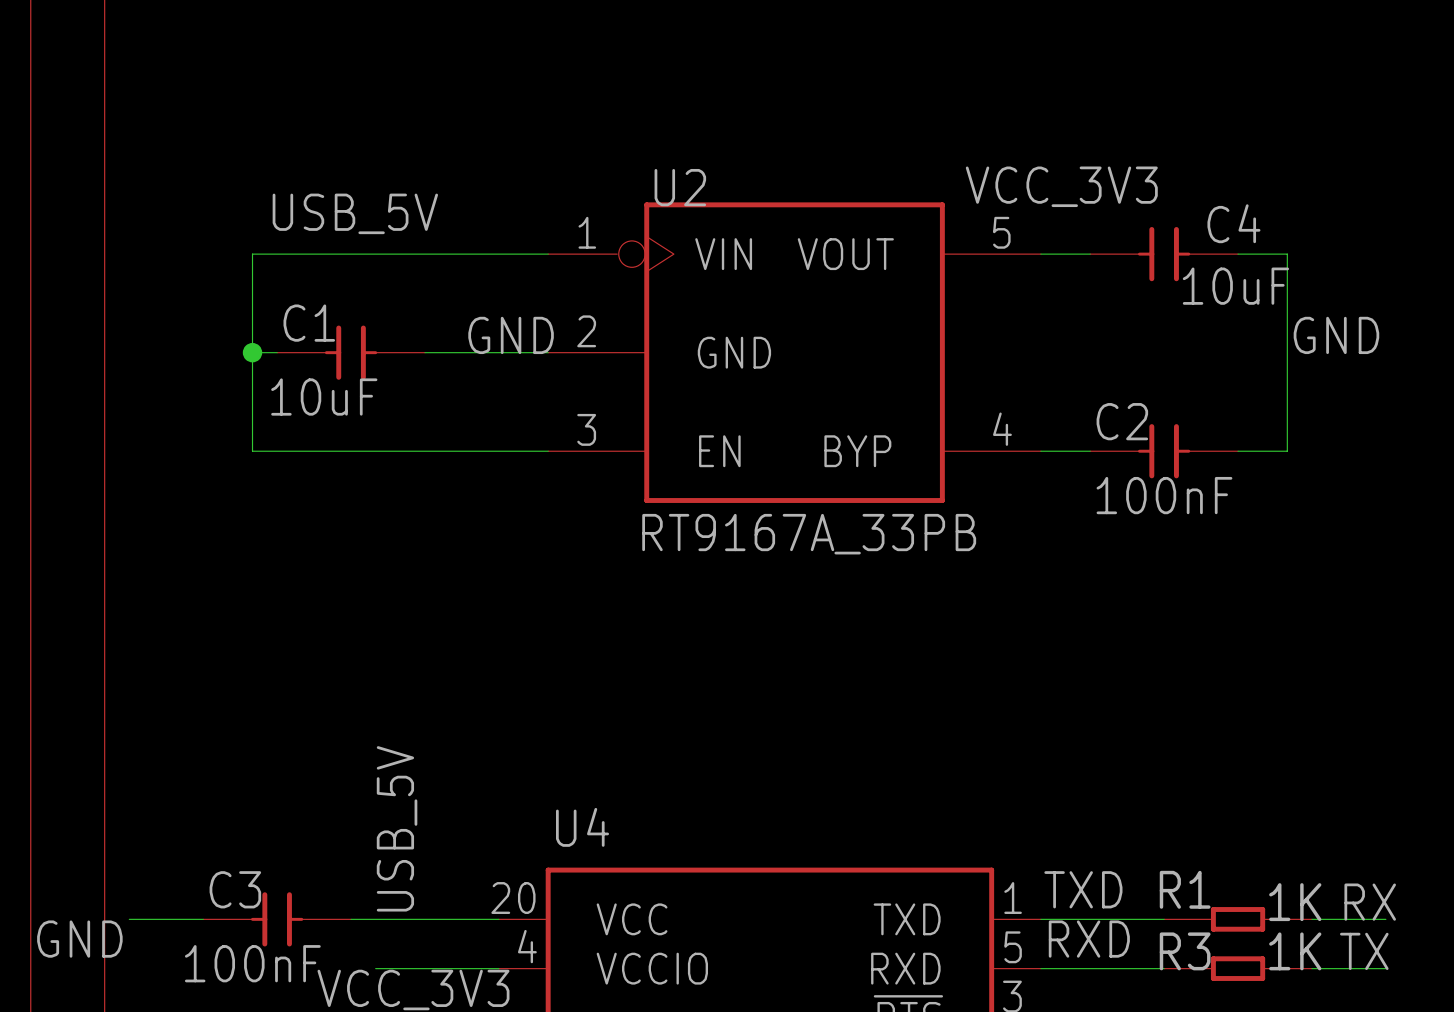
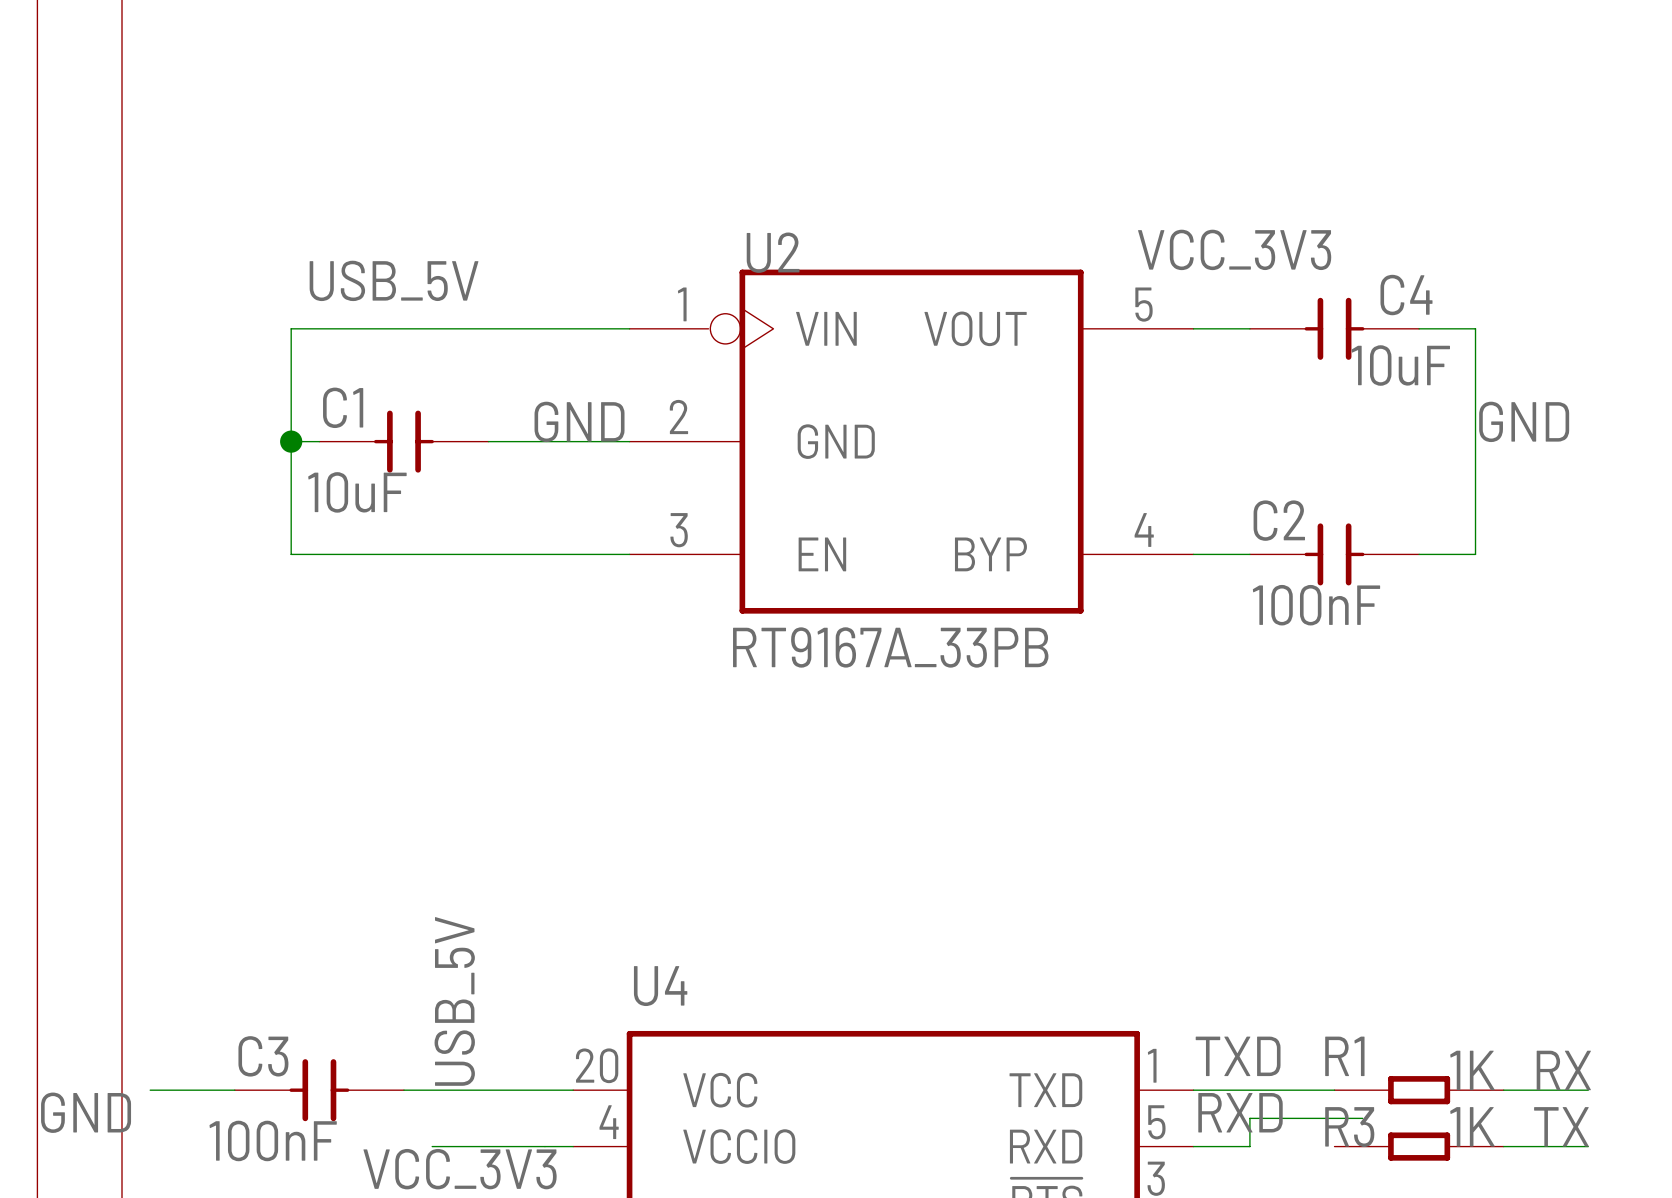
wire: (1090, 968) (1164, 968) -> (1249, 1146) (1249, 1118) (1362, 1118)

